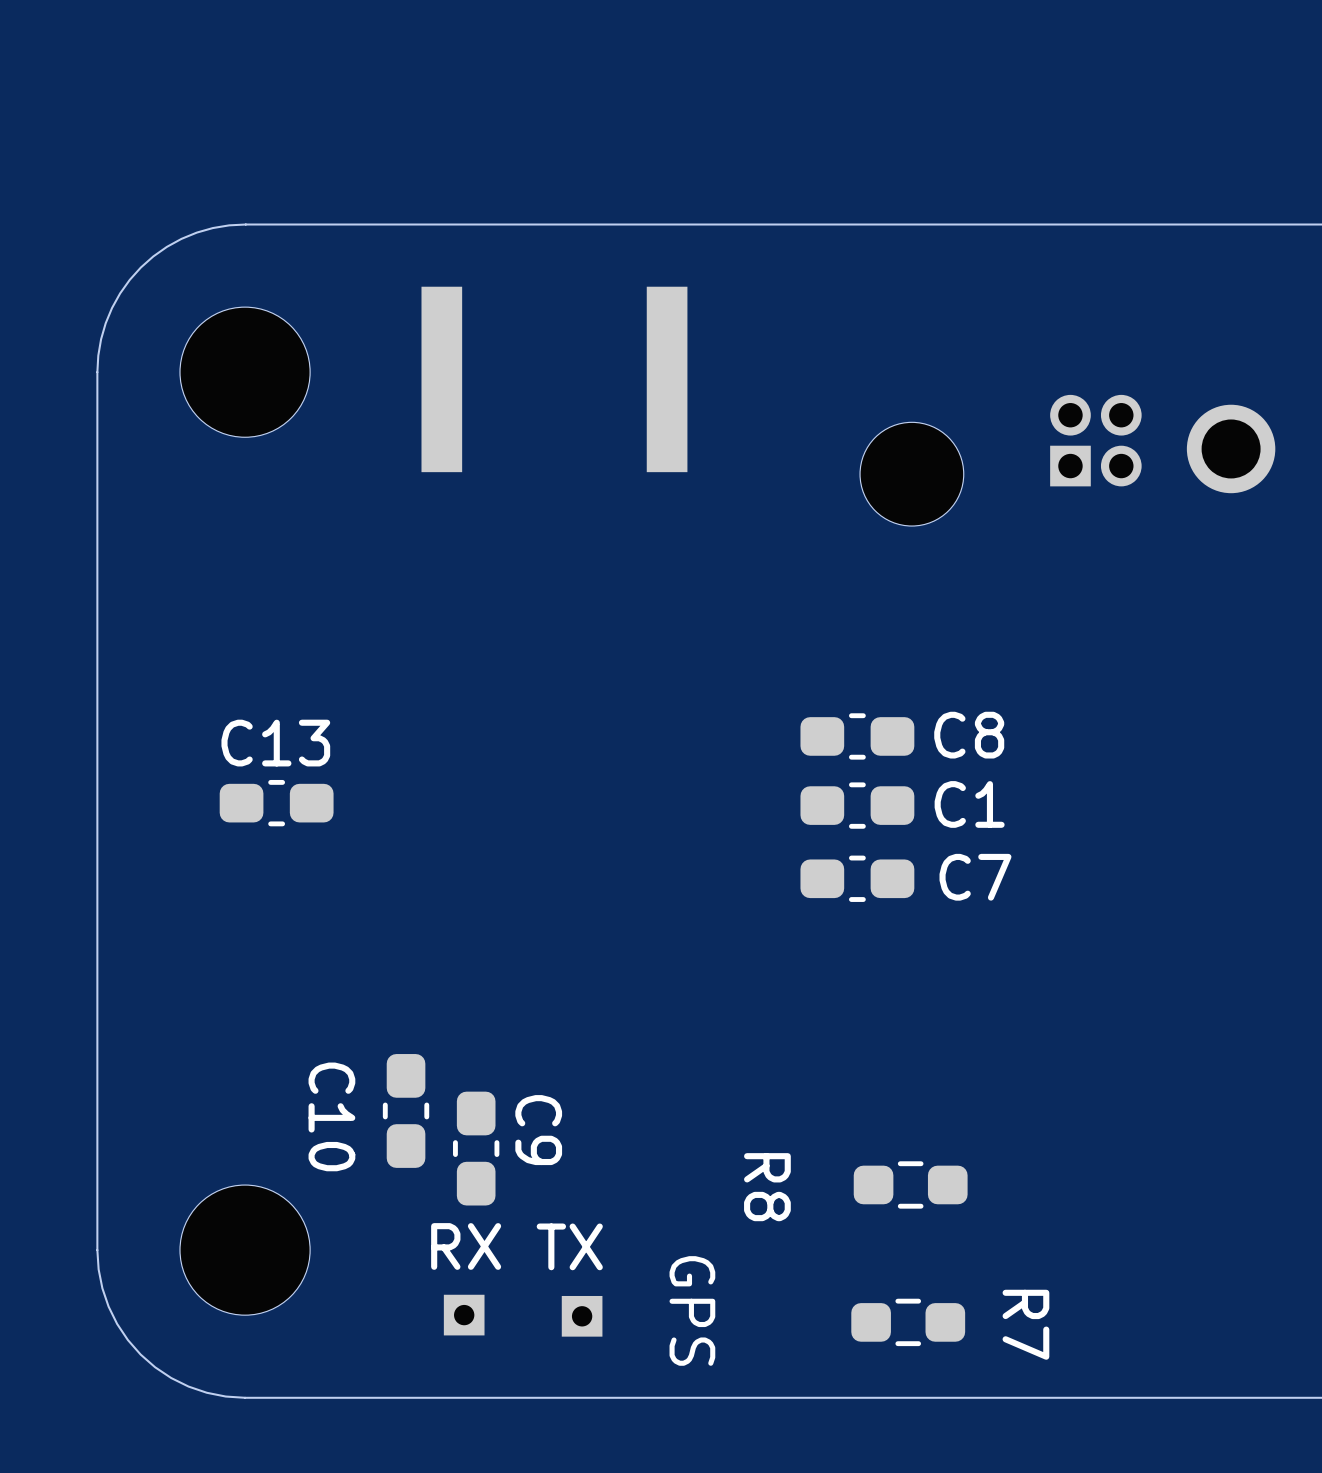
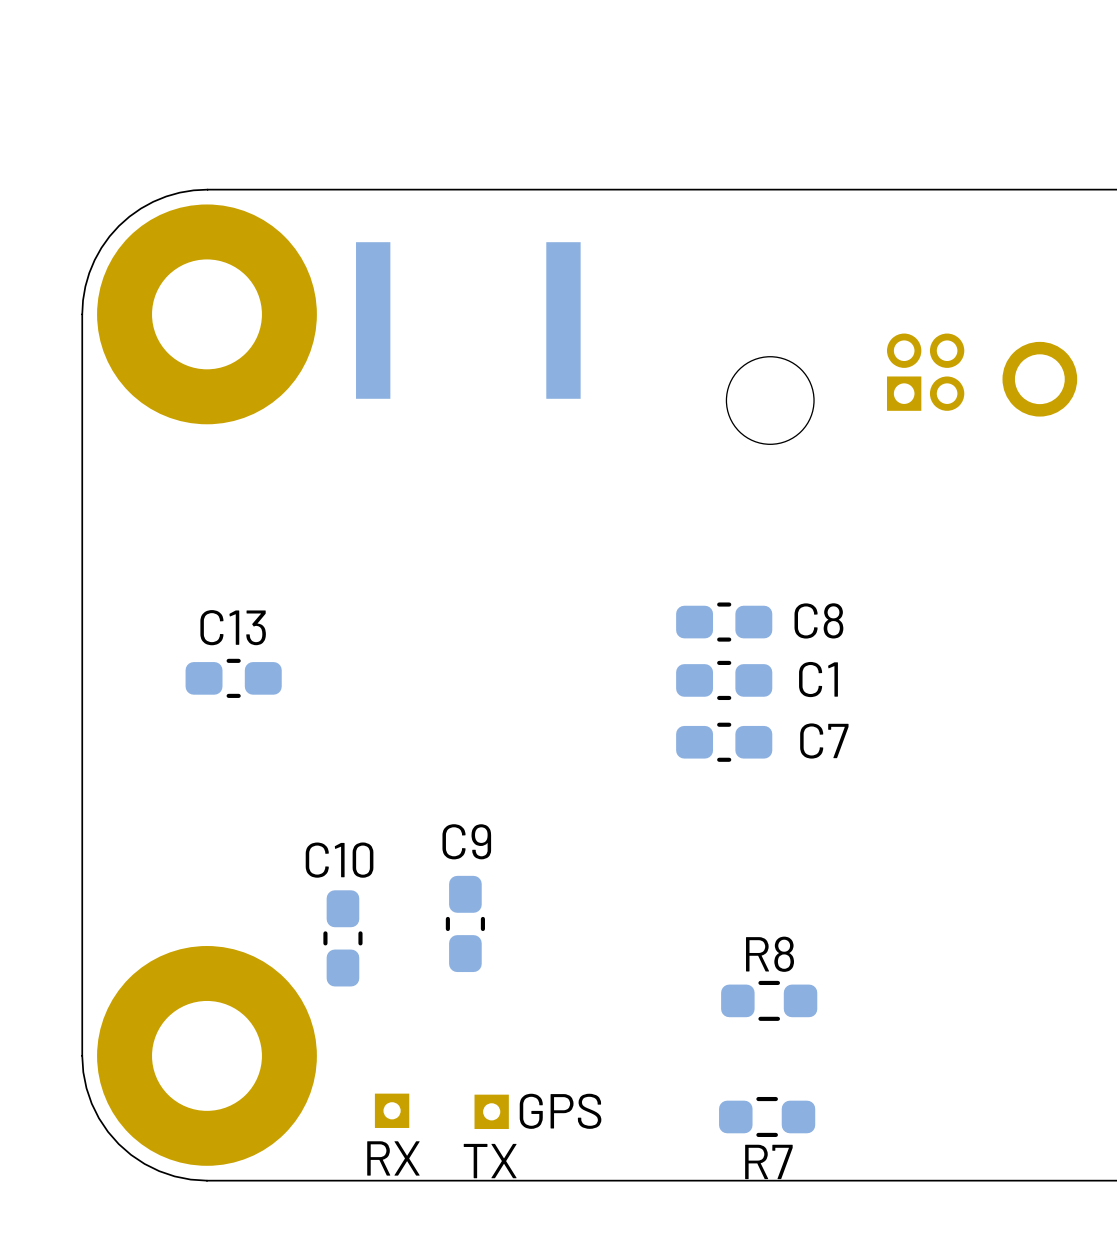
part footprint: [179, 307, 311, 438] -> [97, 204, 317, 425]
C10 name rotation: 0° (331, 1116) -> 90° counterclockwise (339, 860)
C9 name rotation: 0° (538, 1130) -> 90° counterclockwise (466, 841)
C9 position: (476, 1148) -> (465, 923)
part footprint: [179, 1185, 311, 1316] -> [97, 946, 317, 1166]
R8 name rotation: 0° (767, 1187) -> 90° counterclockwise (770, 954)
R8 name position: R8 (767, 1187) -> R8 (770, 954)
text position: RX (466, 1246) -> RX (393, 1158)
text position: TX (569, 1246) -> TX (490, 1161)
text rotation: 0° (692, 1310) -> 90° counterclockwise (560, 1111)
R7 name rotation: 0° (1025, 1324) -> 90° counterclockwise (768, 1161)
R7 name position: R7 (1025, 1324) -> R7 (768, 1161)

